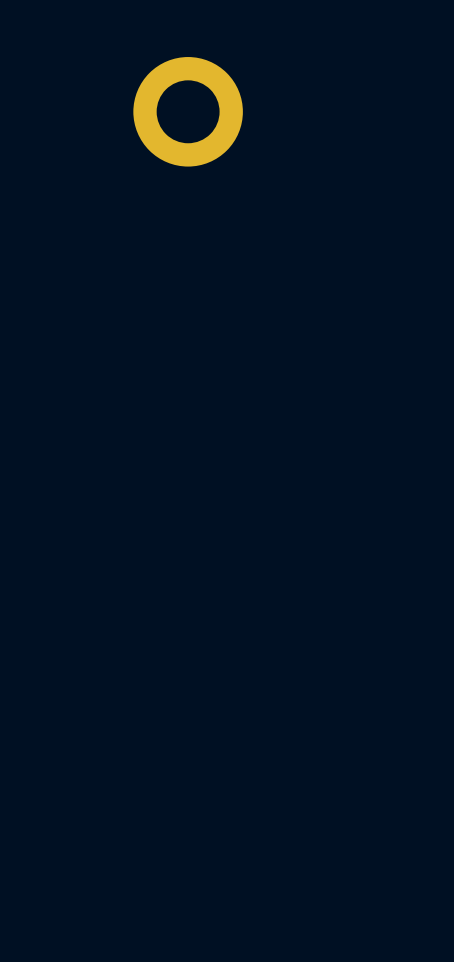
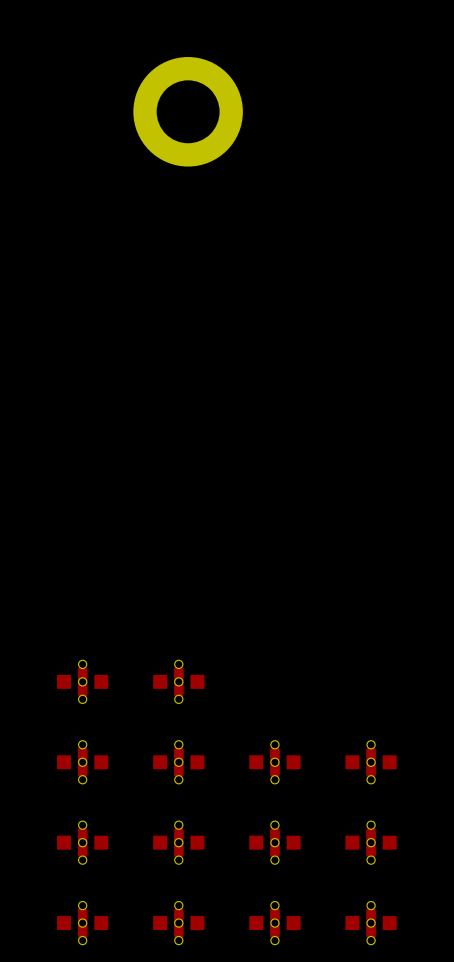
part: none -> (82, 681)
part: none -> (178, 681)
part: none -> (82, 762)
part: none -> (178, 762)
part: none -> (274, 762)
part: none -> (371, 762)
part: none -> (82, 842)
part: none -> (178, 842)
part: none -> (274, 842)
part: none -> (371, 842)
part: none -> (82, 923)
part: none -> (178, 923)
part: none -> (274, 923)
part: none -> (371, 923)

